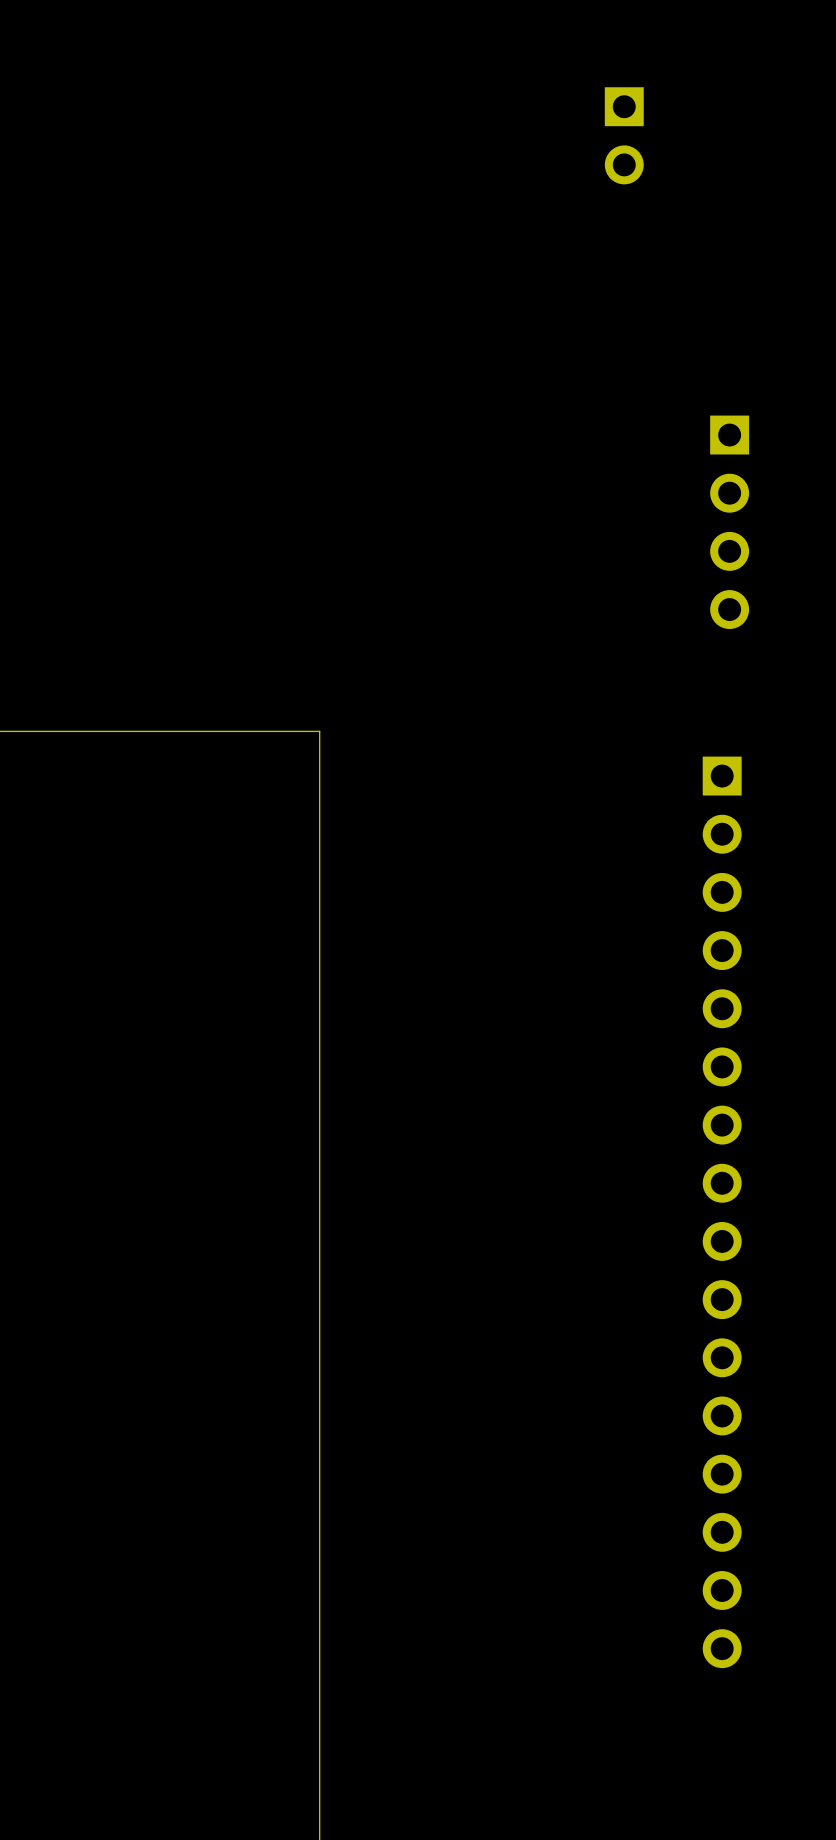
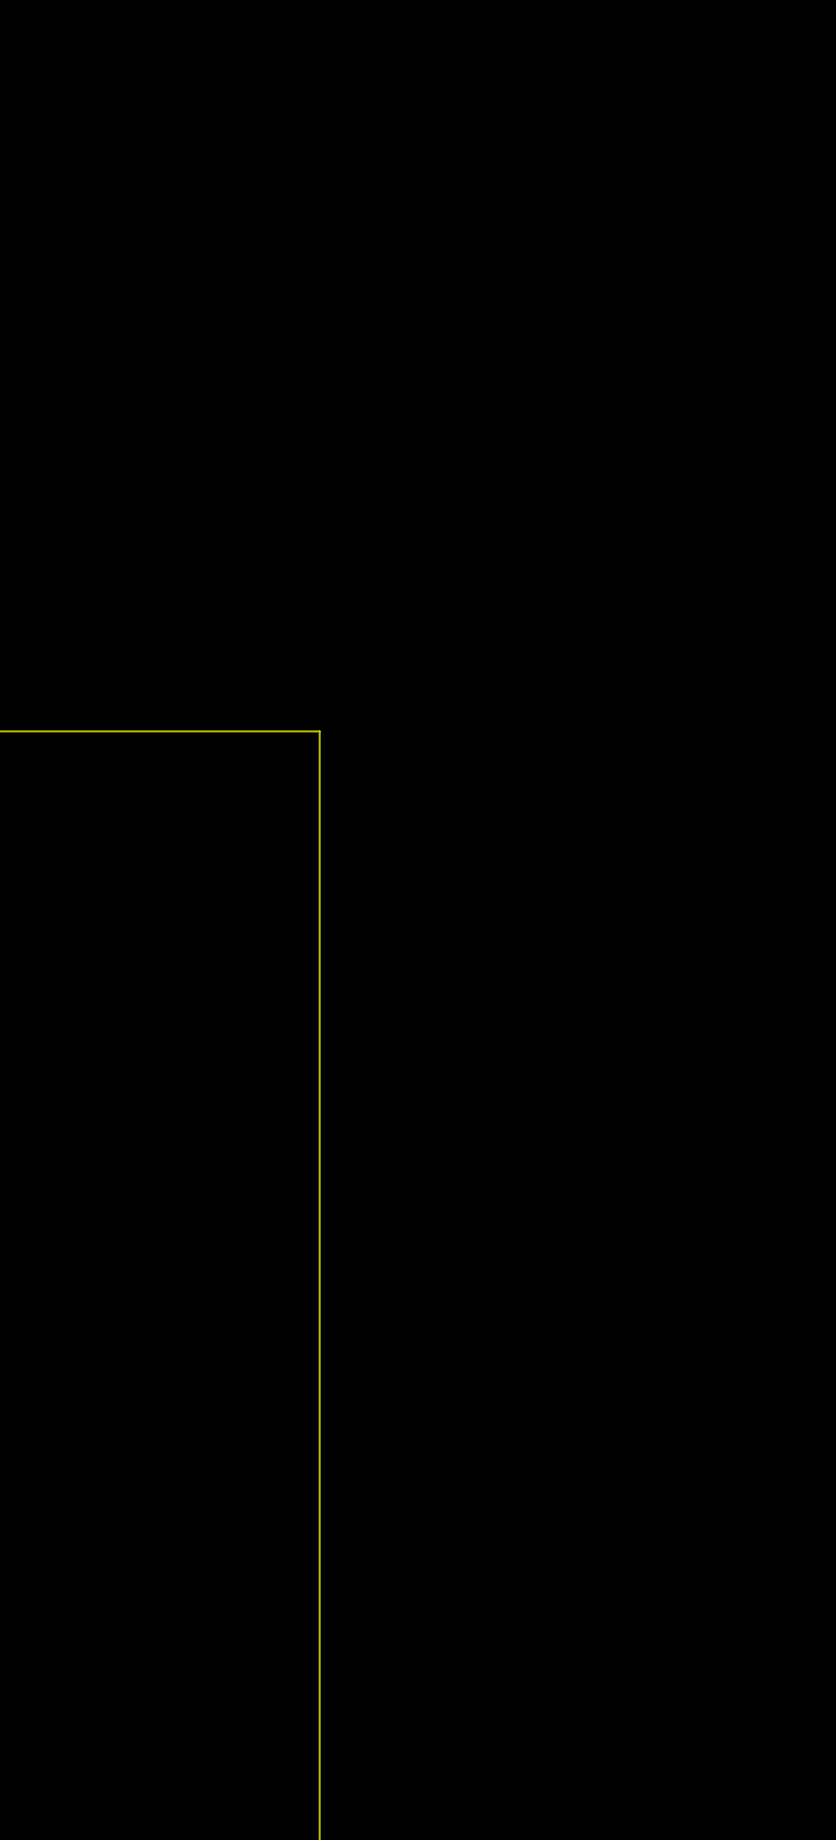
part: (624, 135) -> none
part: (729, 522) -> none
part: (722, 1212) -> none

